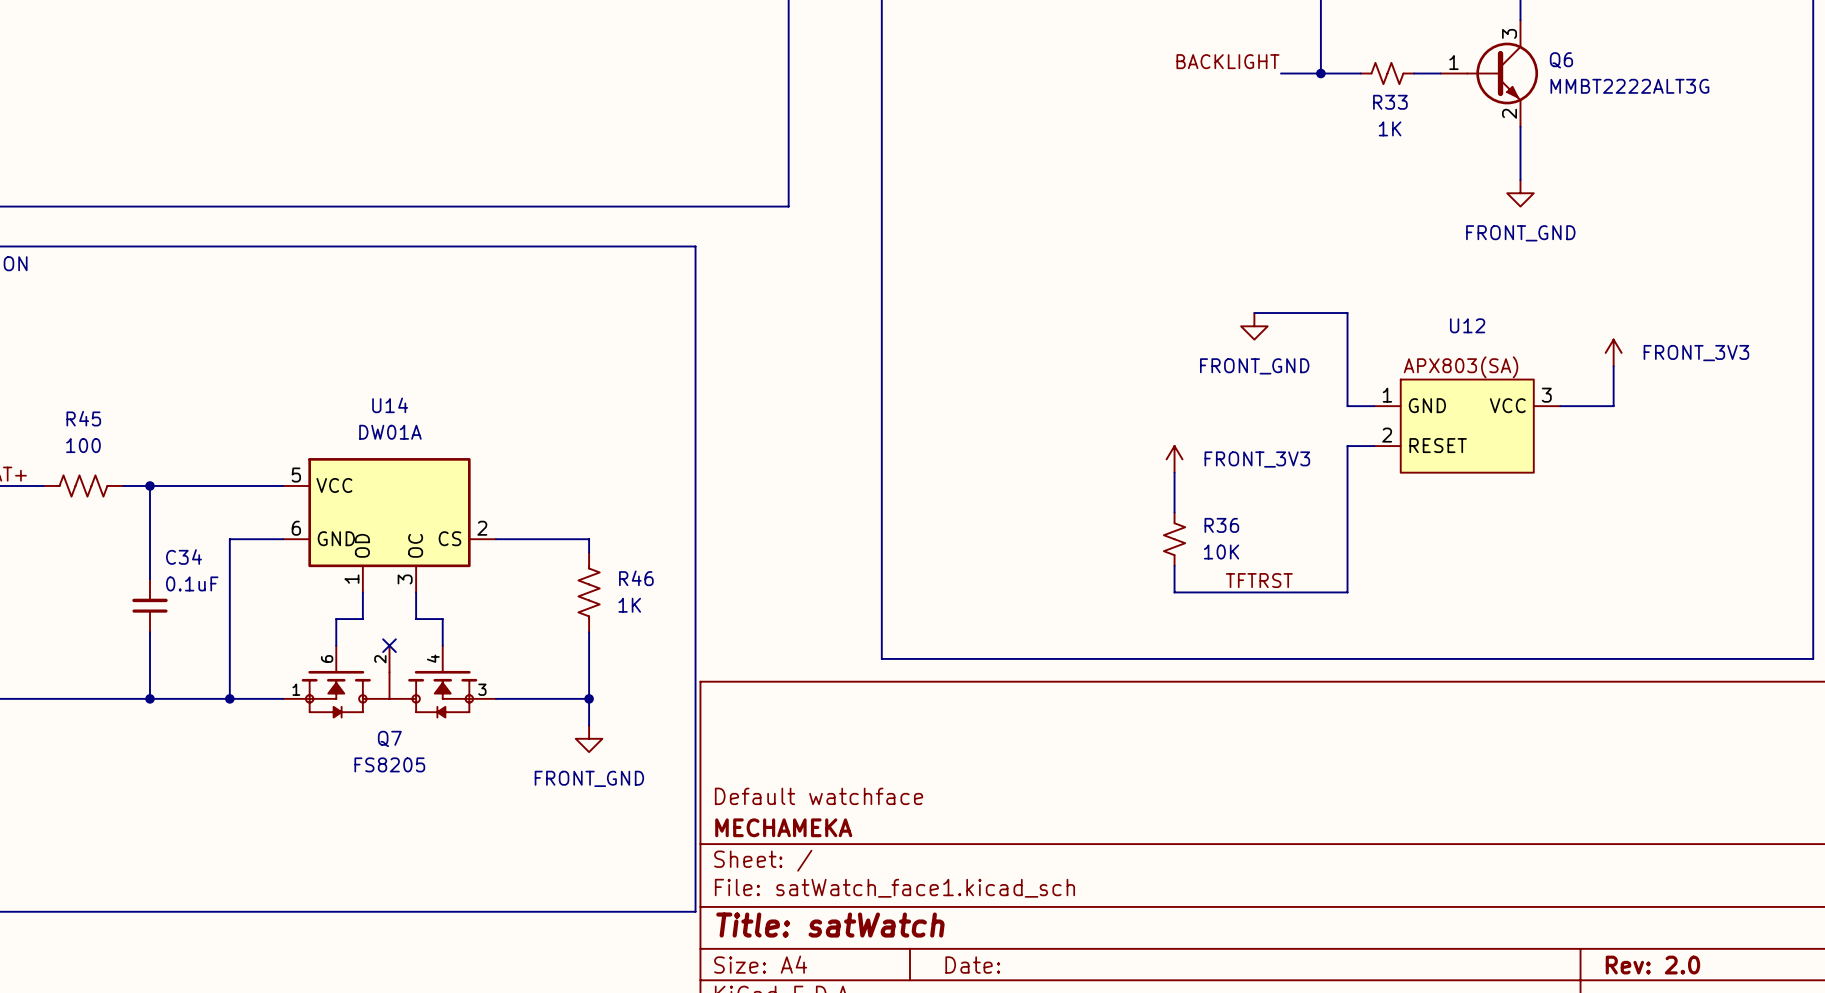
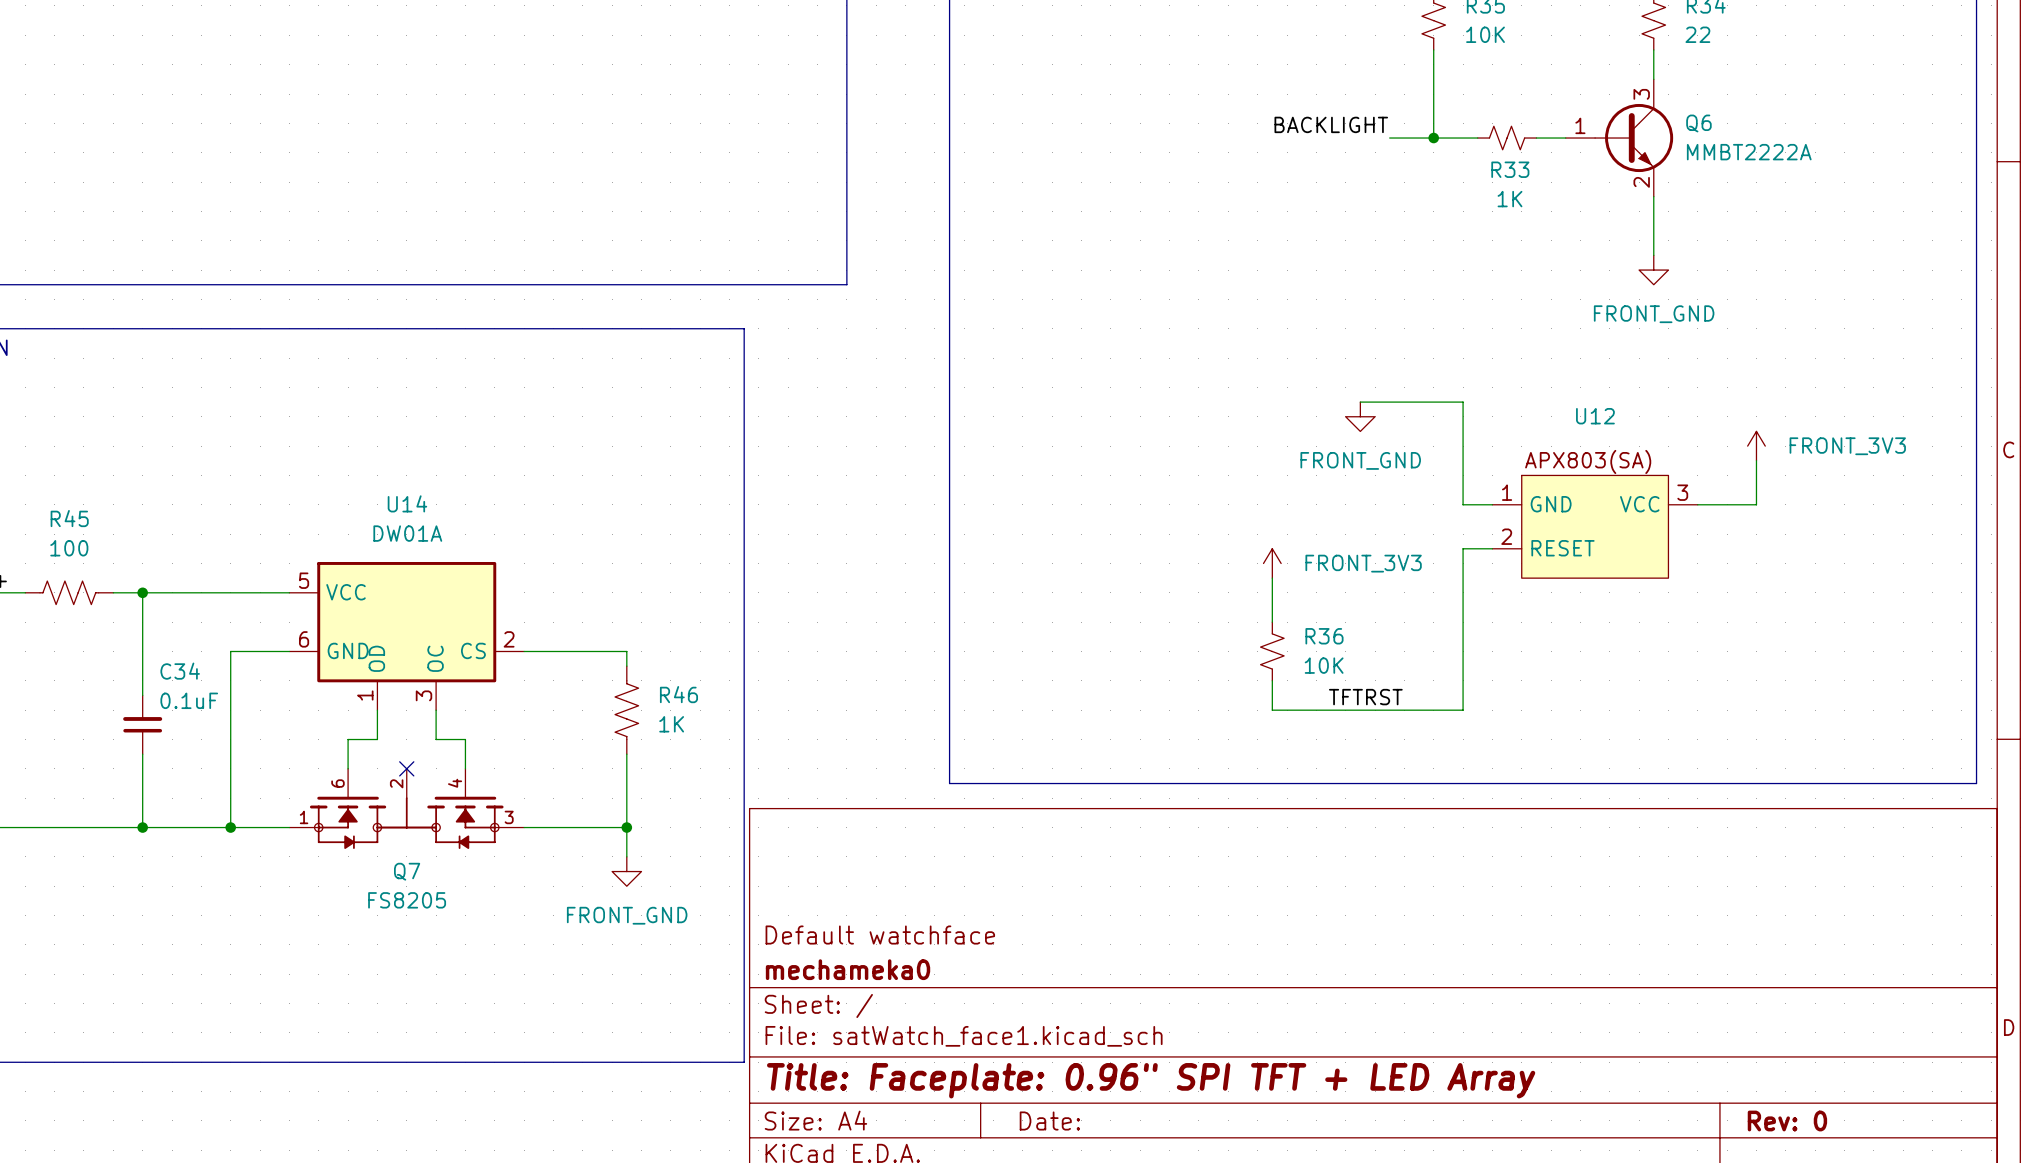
Q6 value: MMBT2222ALT3G (1629, 86) -> MMBT2222A (1749, 152)
title block: MECHAMEKA (783, 827) -> mechameka0 (848, 969)
title block: Title: satWatch (830, 925) -> Title: Faceplate: 0.96" SPI TFT + LED Array (1151, 1080)
title block: Rev: 2.0 (1652, 965) -> Rev: 0 (1787, 1121)

